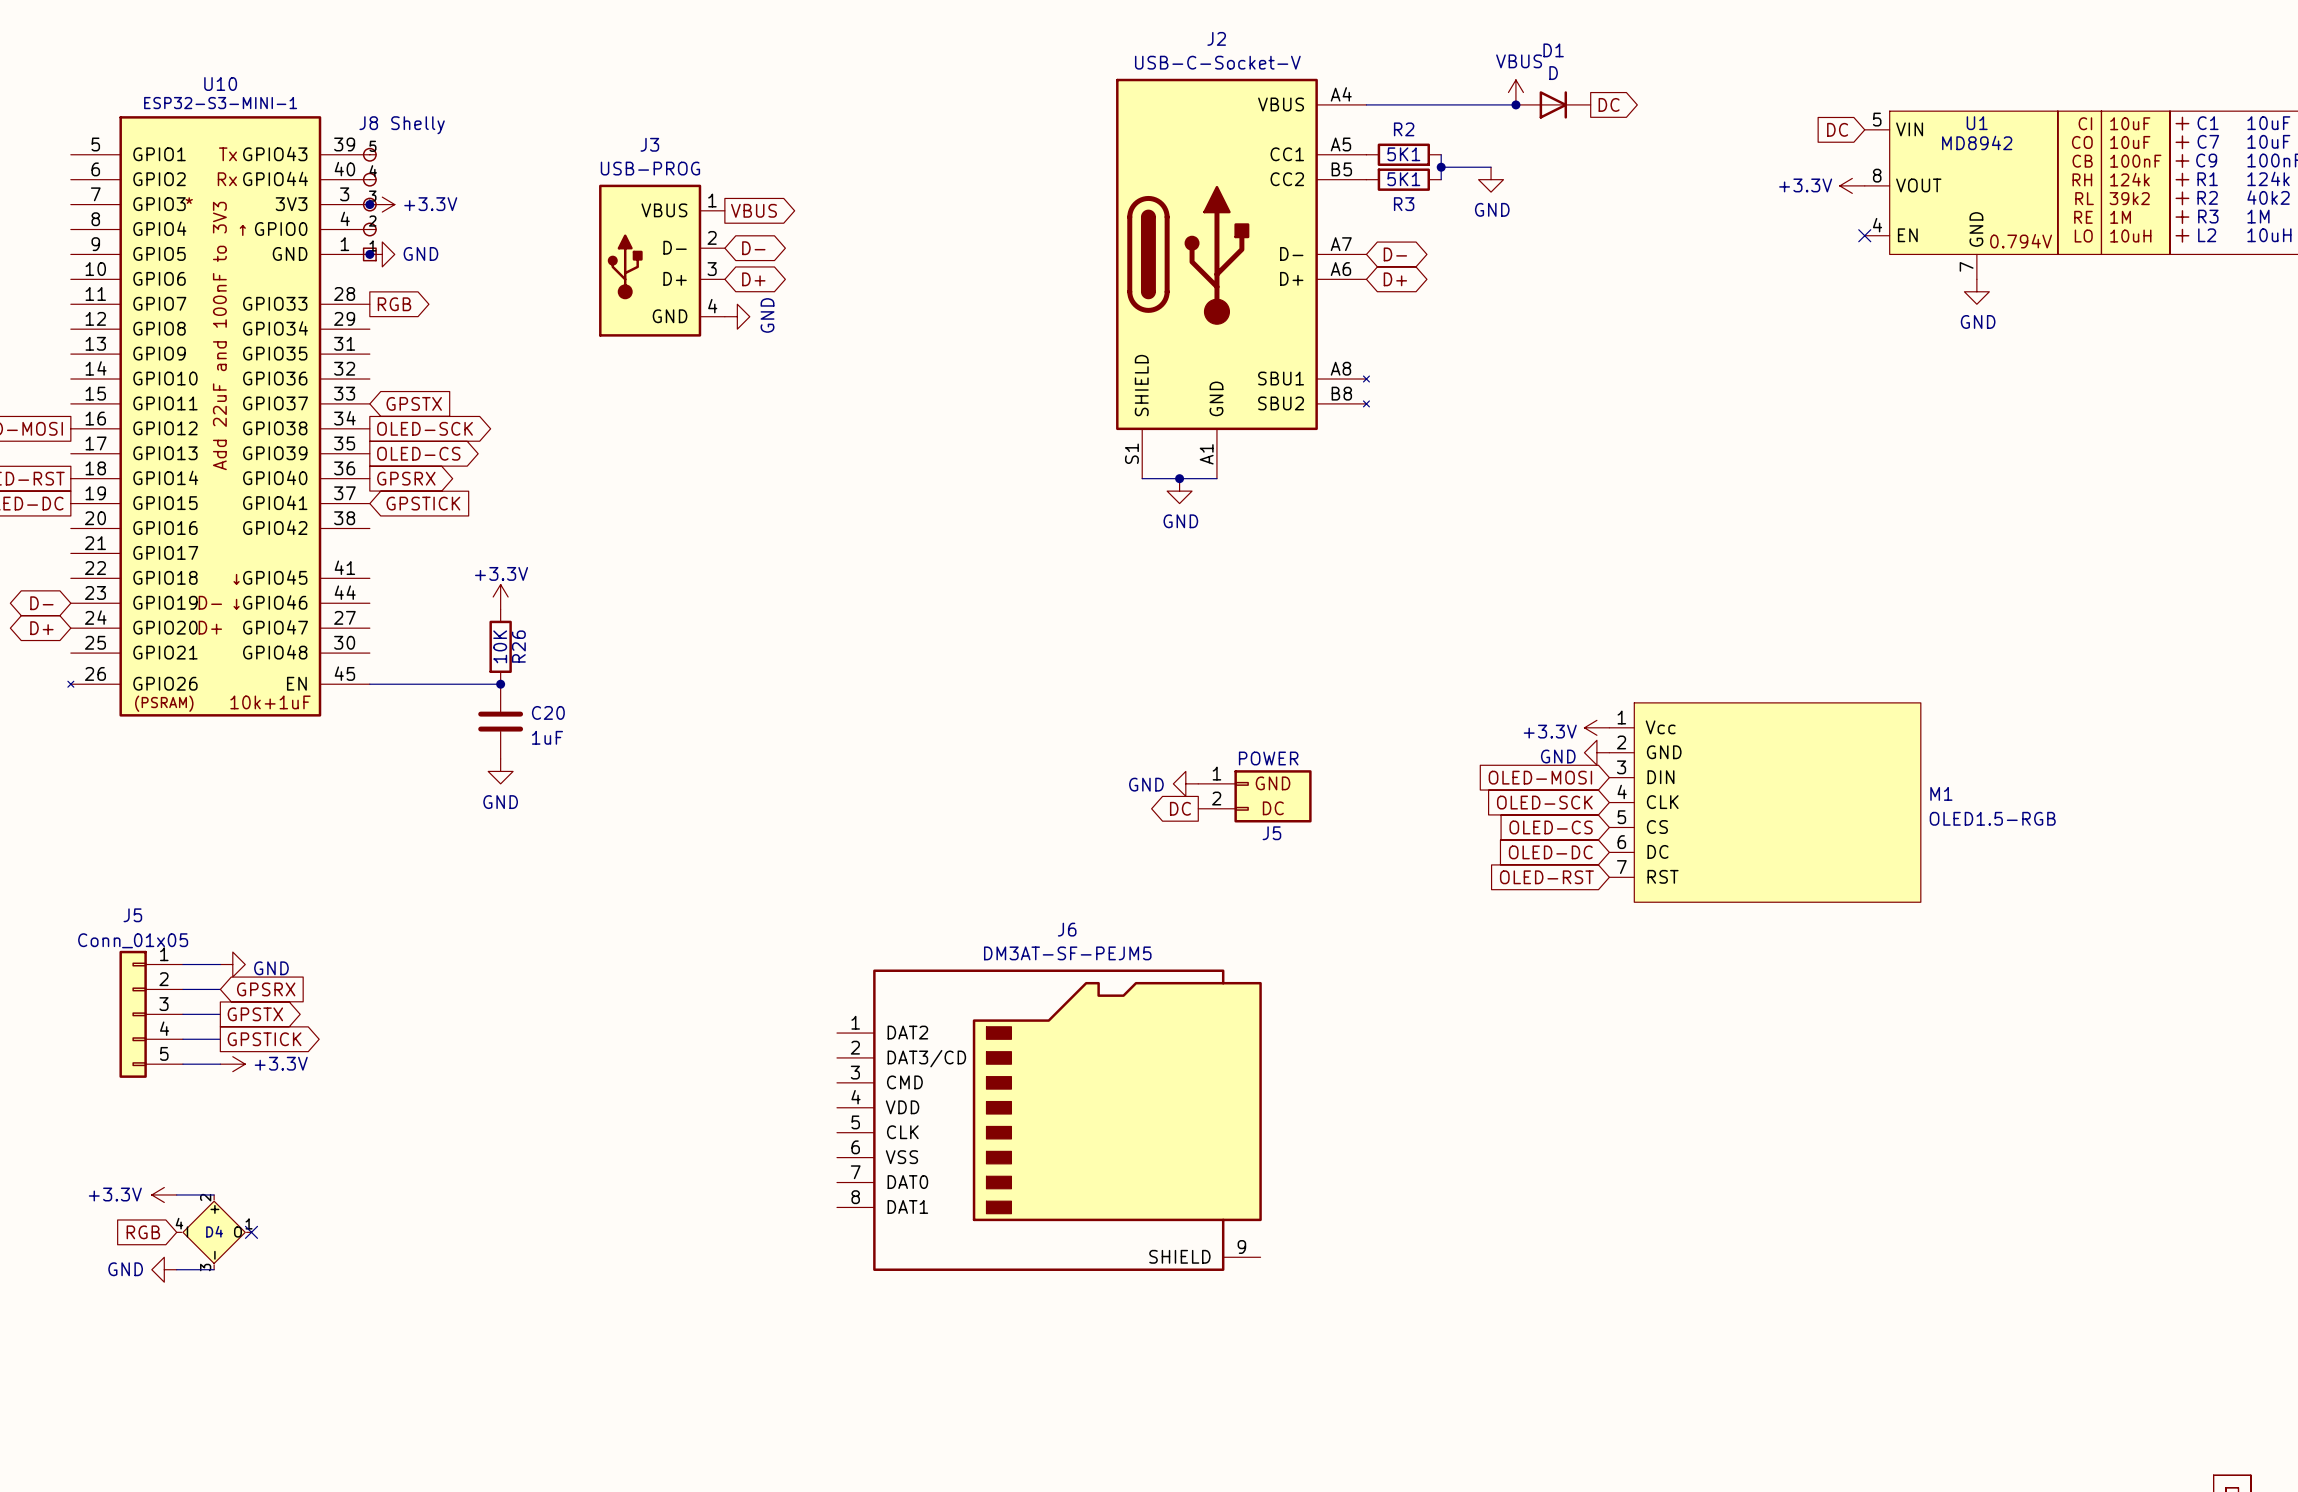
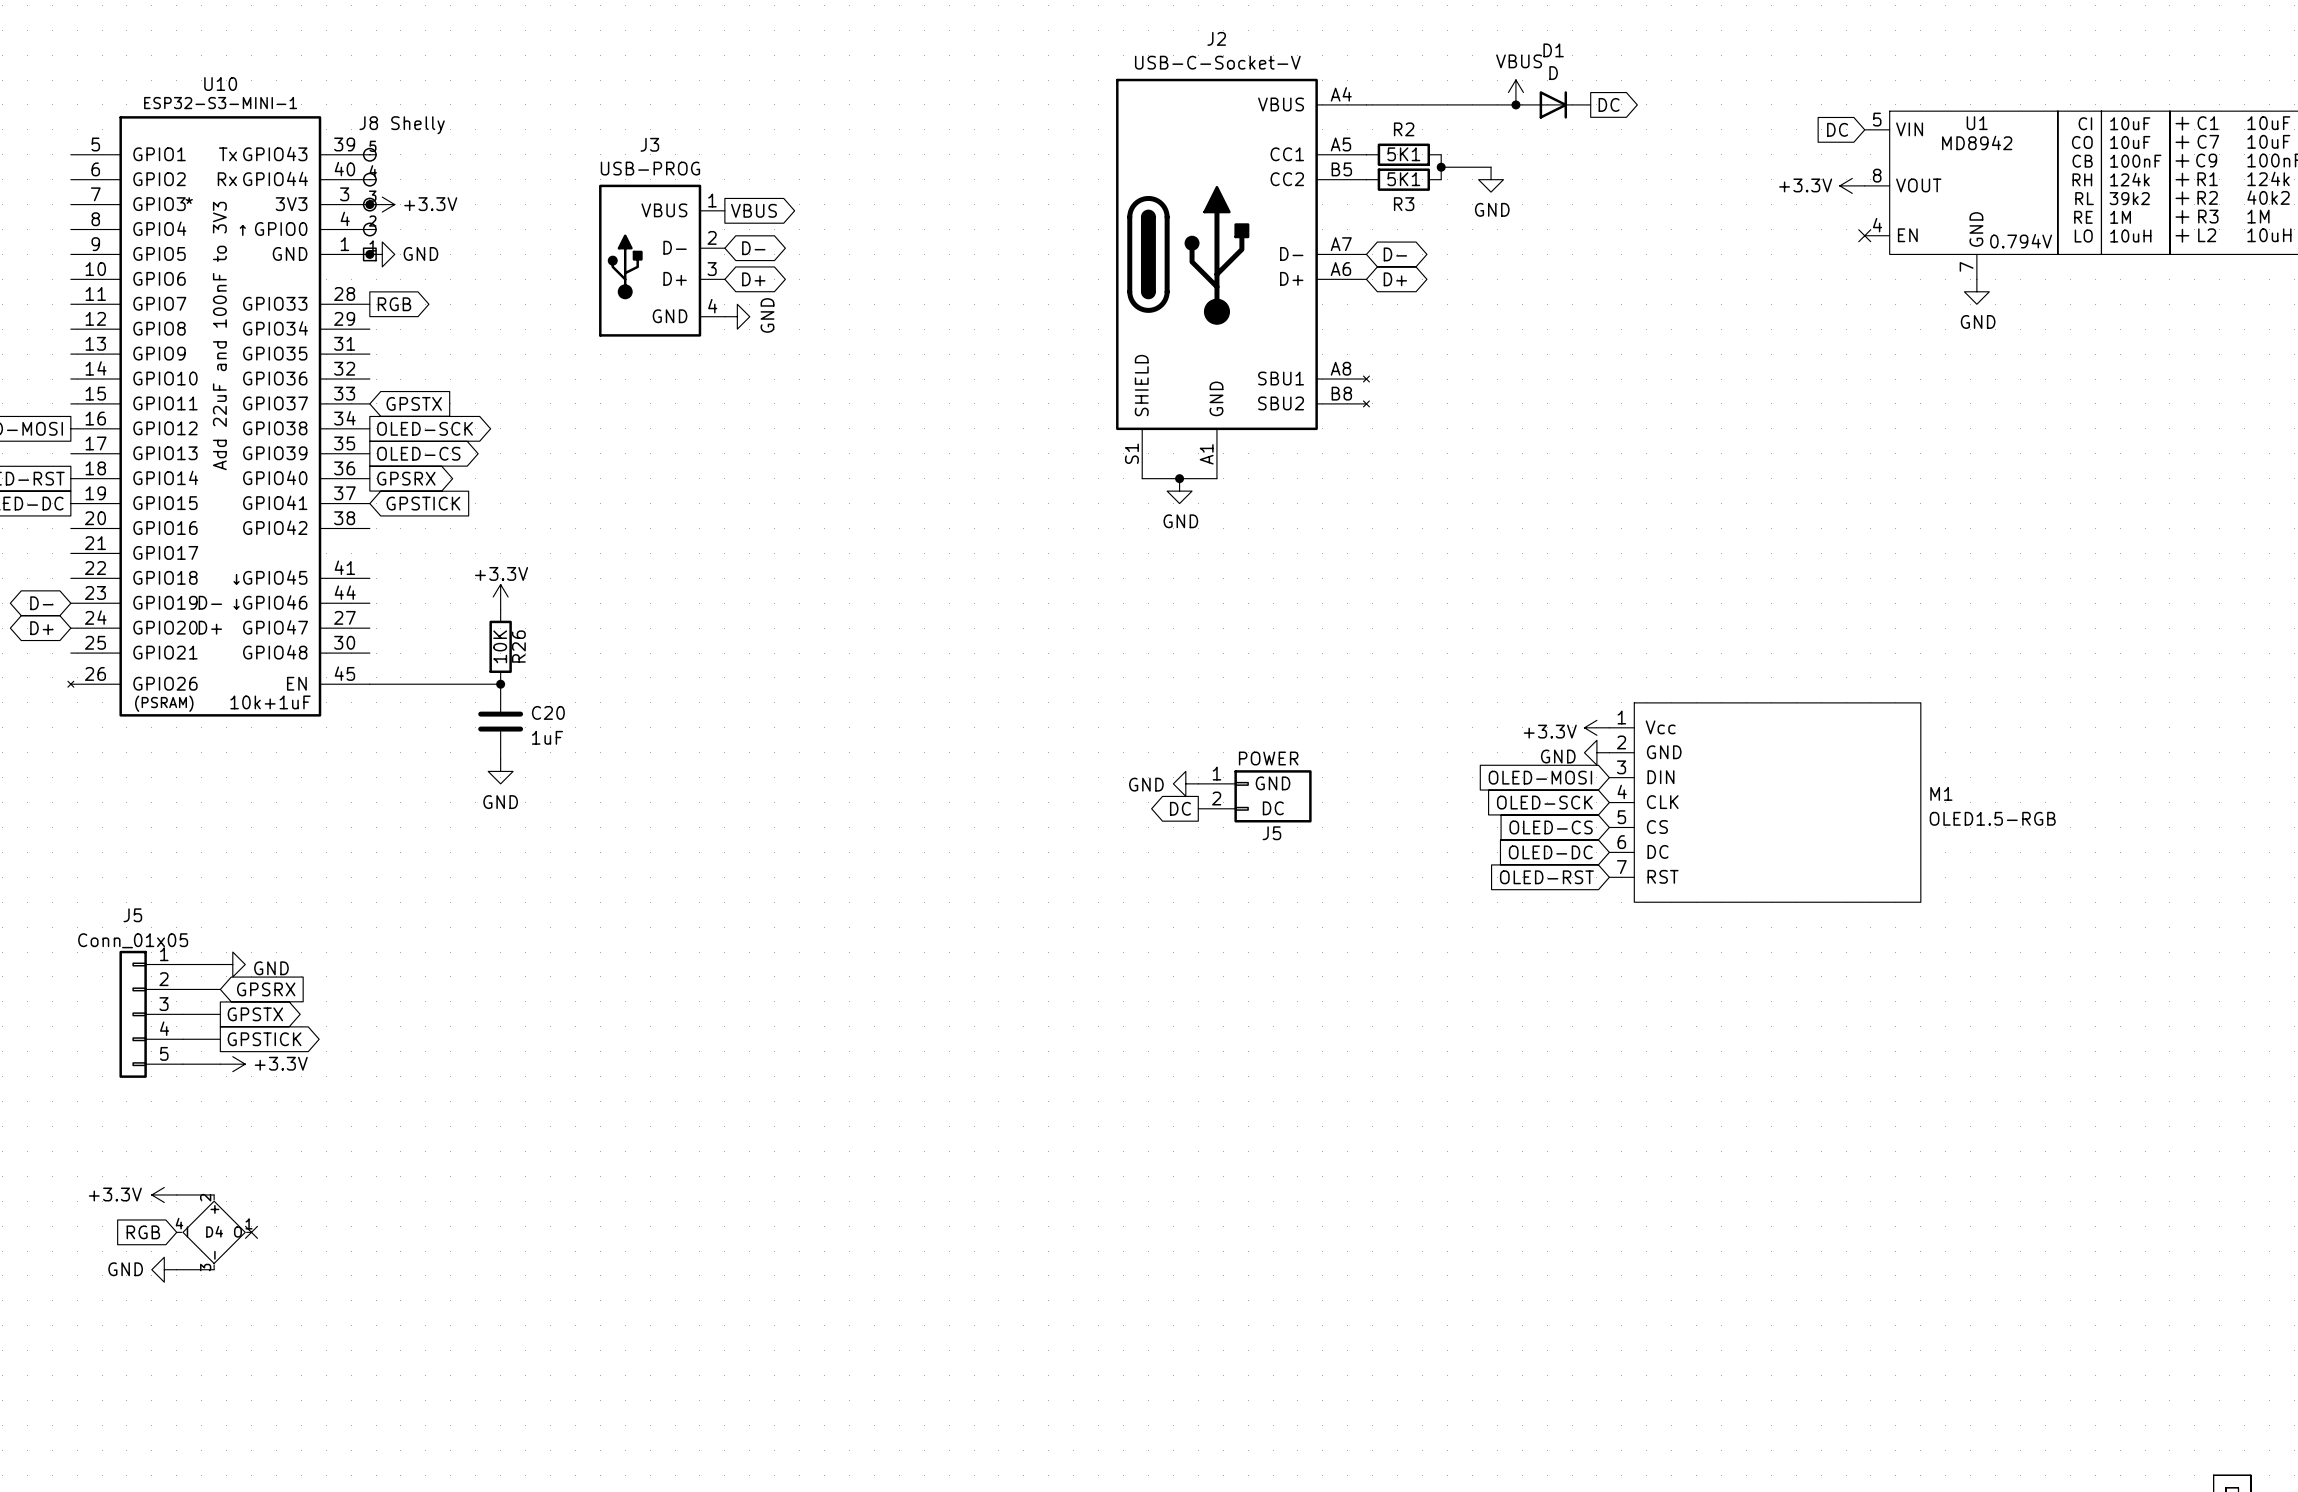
J6: DM3AT-SF-PEJM5 (1049, 1120) -> none

